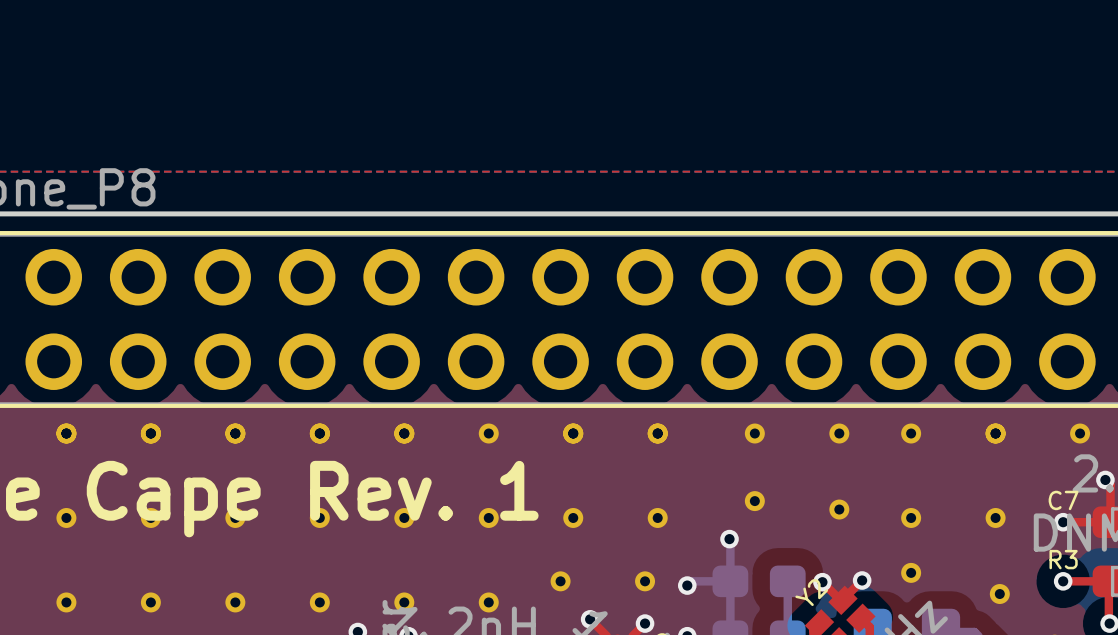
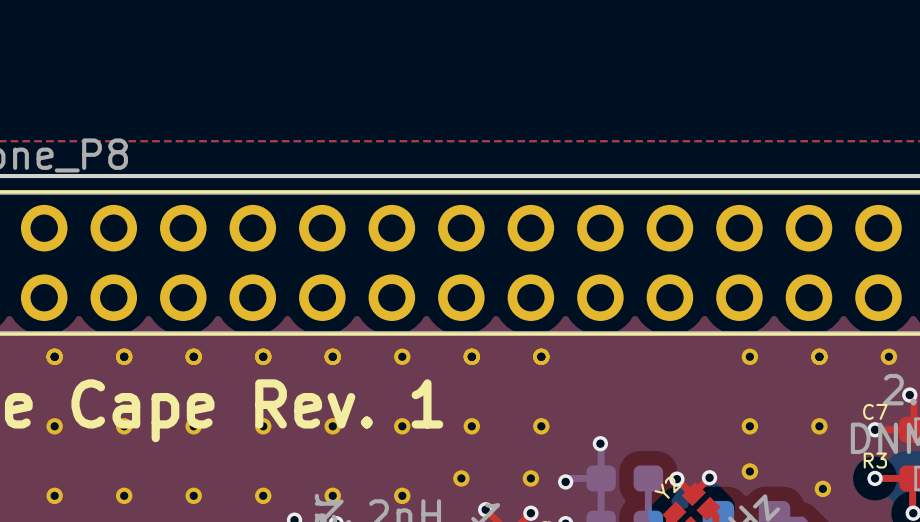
part: (754, 433) -> none
part: (839, 433) -> none
part: (754, 501) -> none
part: (839, 509) -> none

